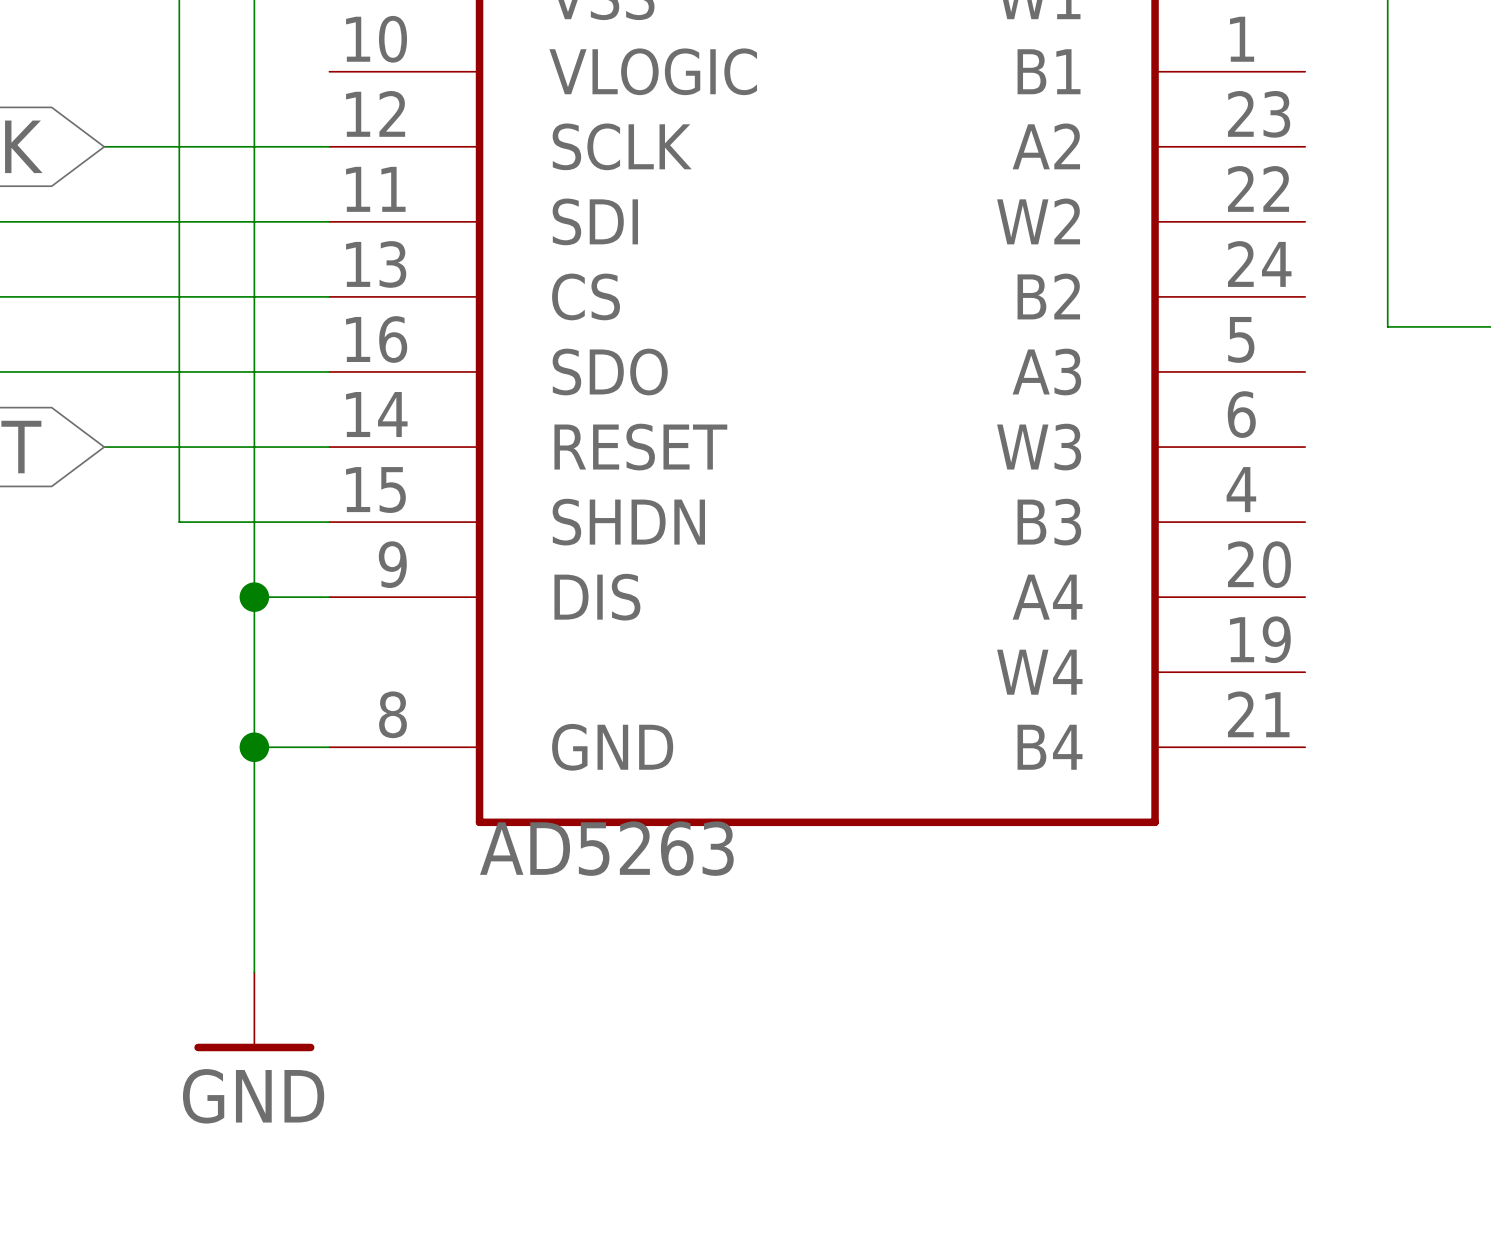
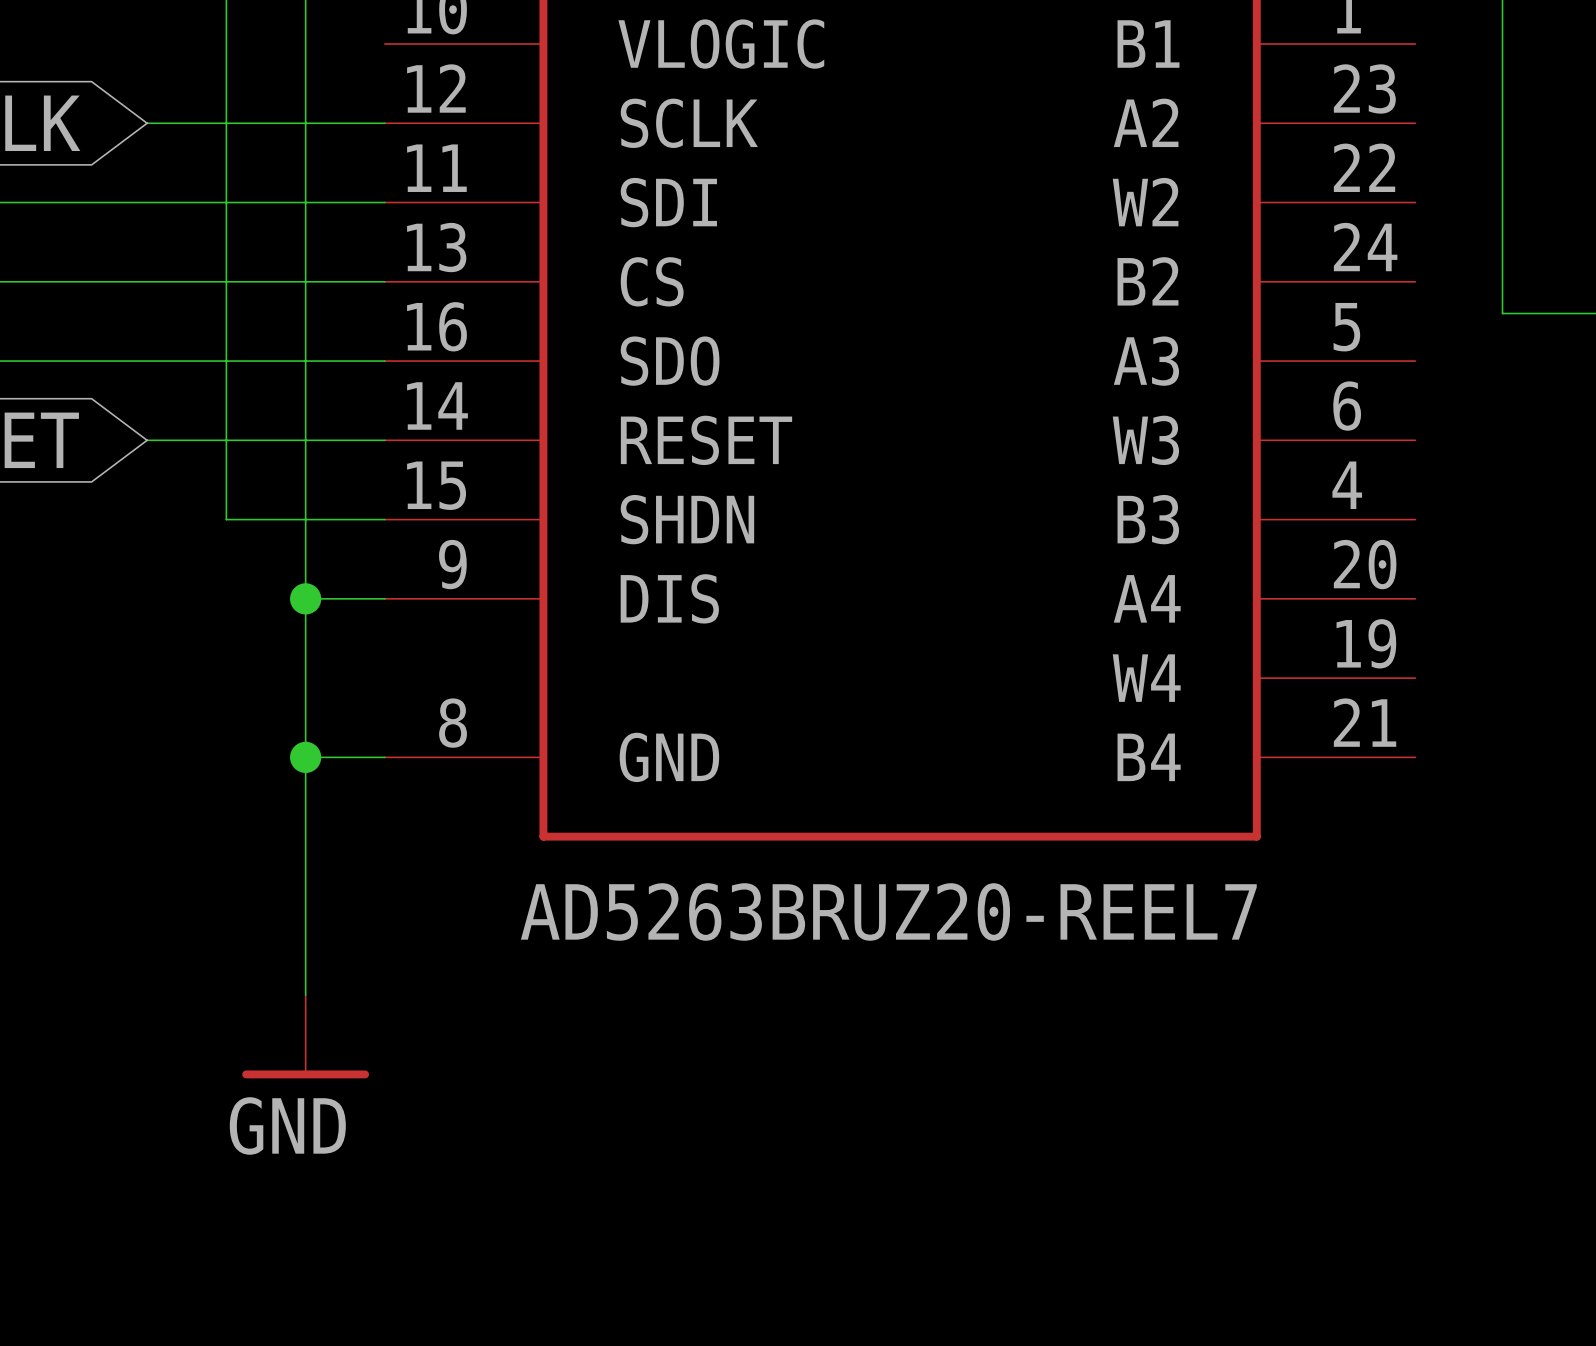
part value: AD5263 (606, 848) -> AD5263BRUZ20-REEL7 (888, 911)

